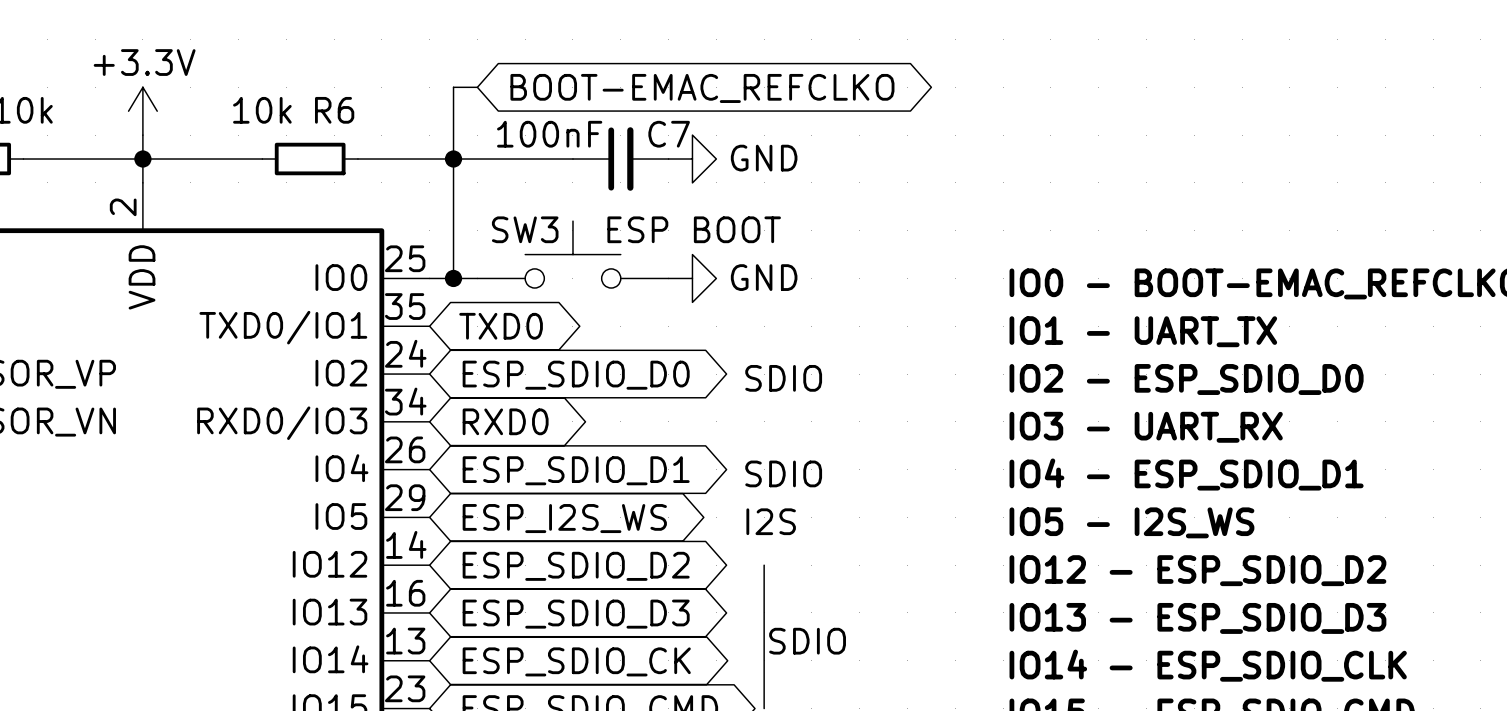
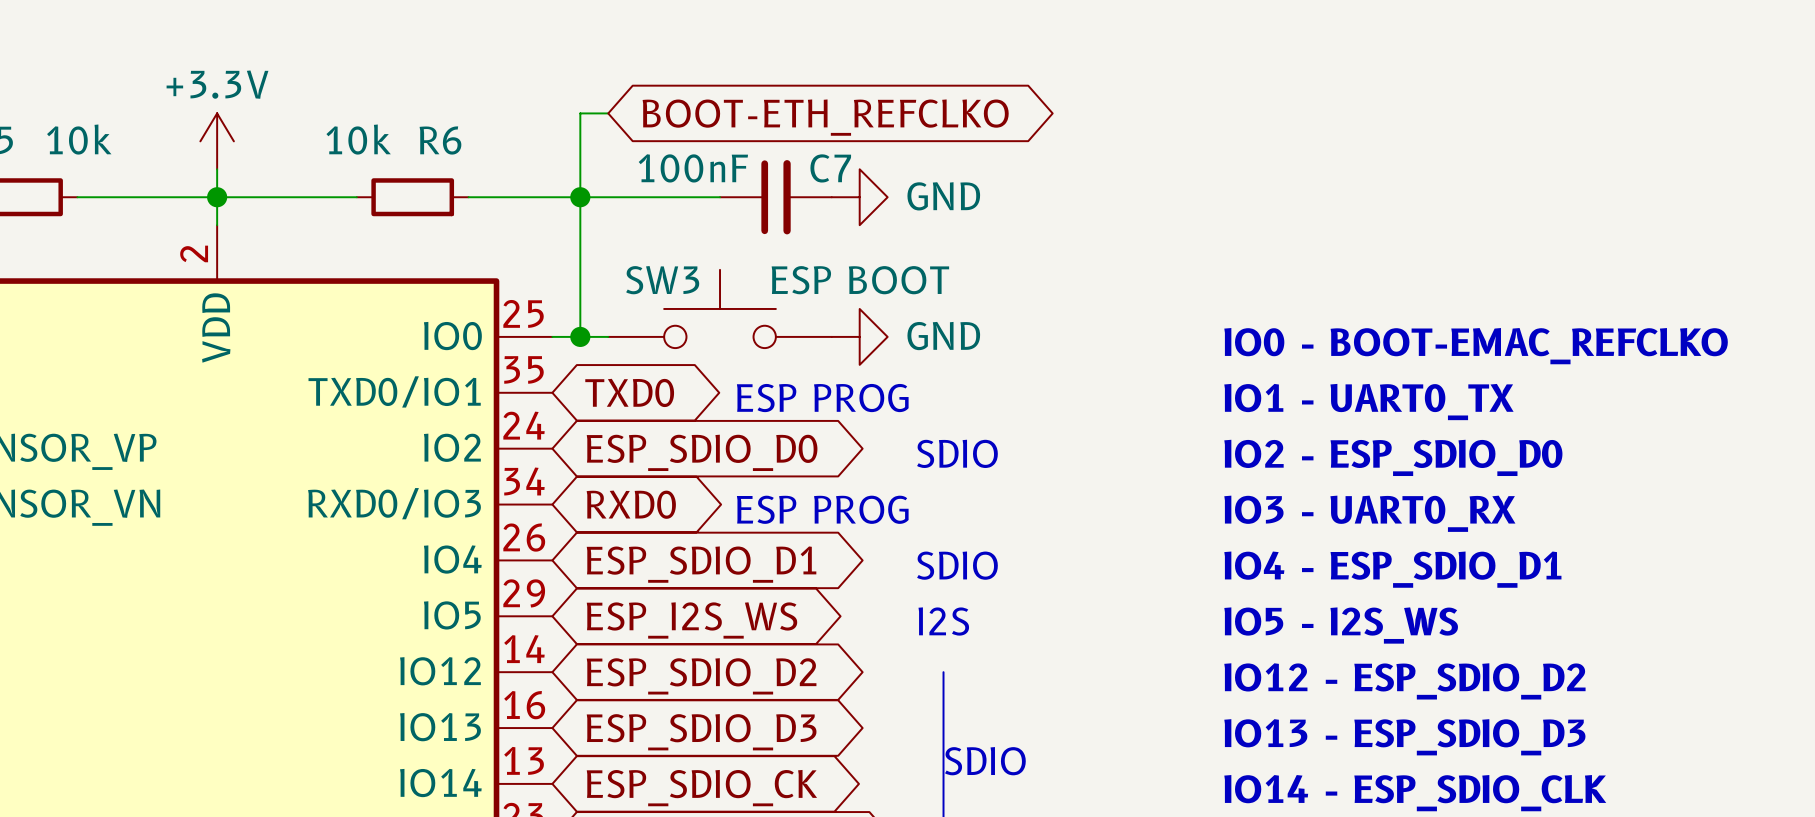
global label: BOOT-EMAC_REFCLKO (702, 88) -> BOOT-ETH_REFCLKO (825, 117)
text: none -> ESP PROG (822, 398)
text: IO1 - UART_TX (1143, 331) -> IO1 - UART0_TX (1368, 402)
text: none -> ESP PROG (822, 509)
text: IO3 - UART_RX (1146, 427) -> IO3 - UART0_RX (1369, 513)

